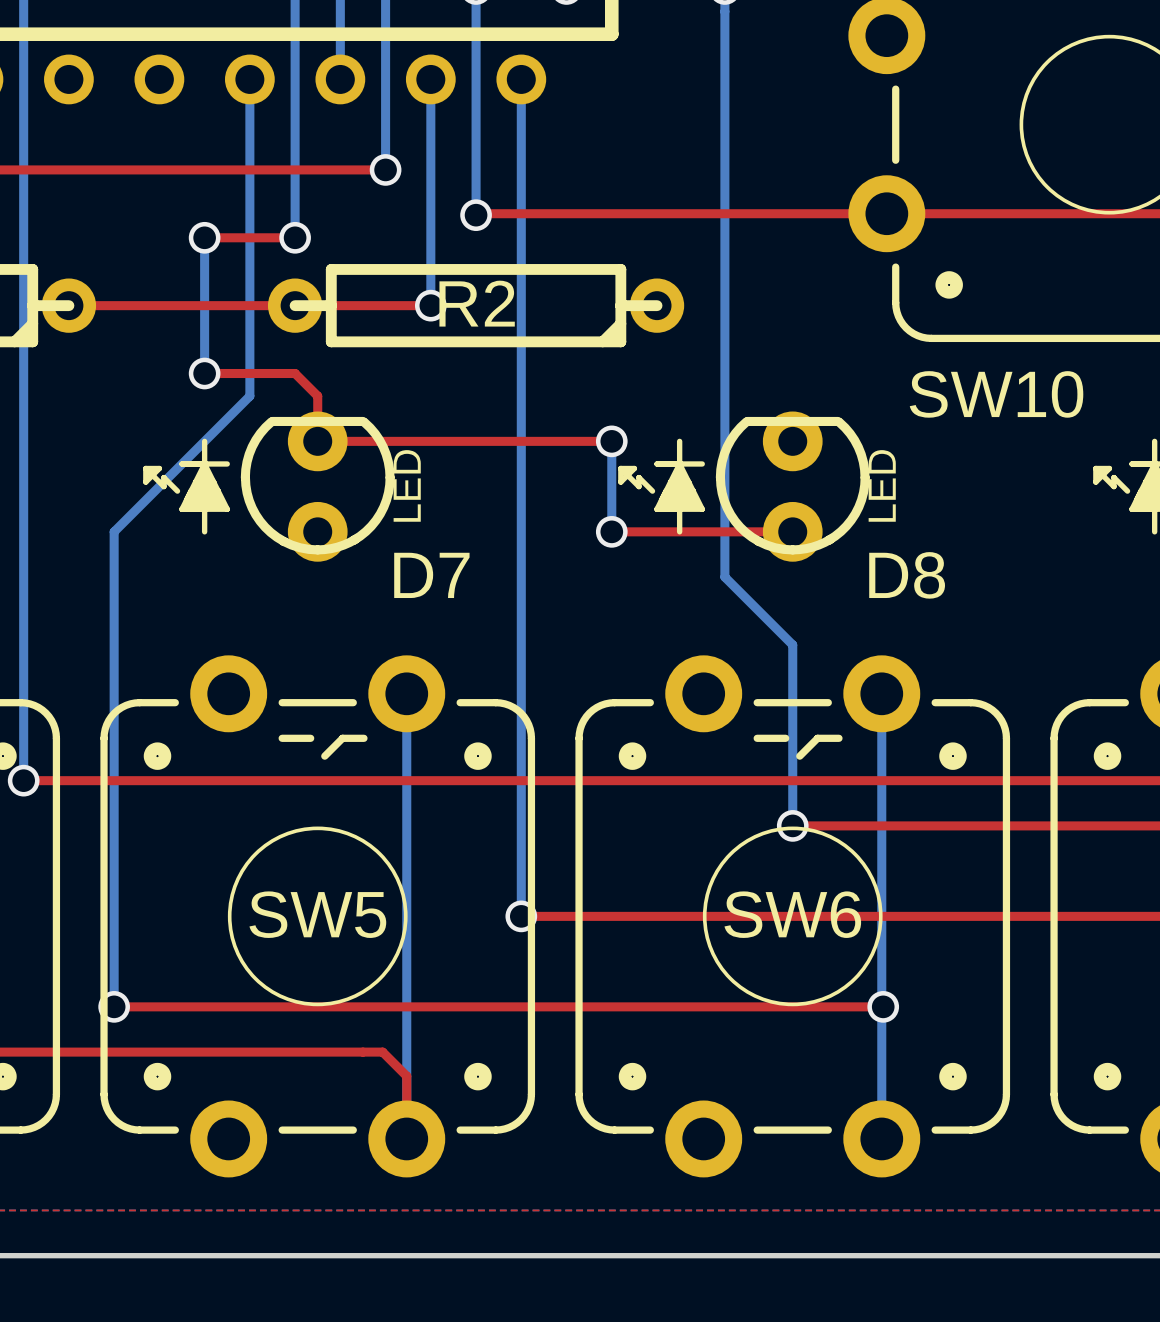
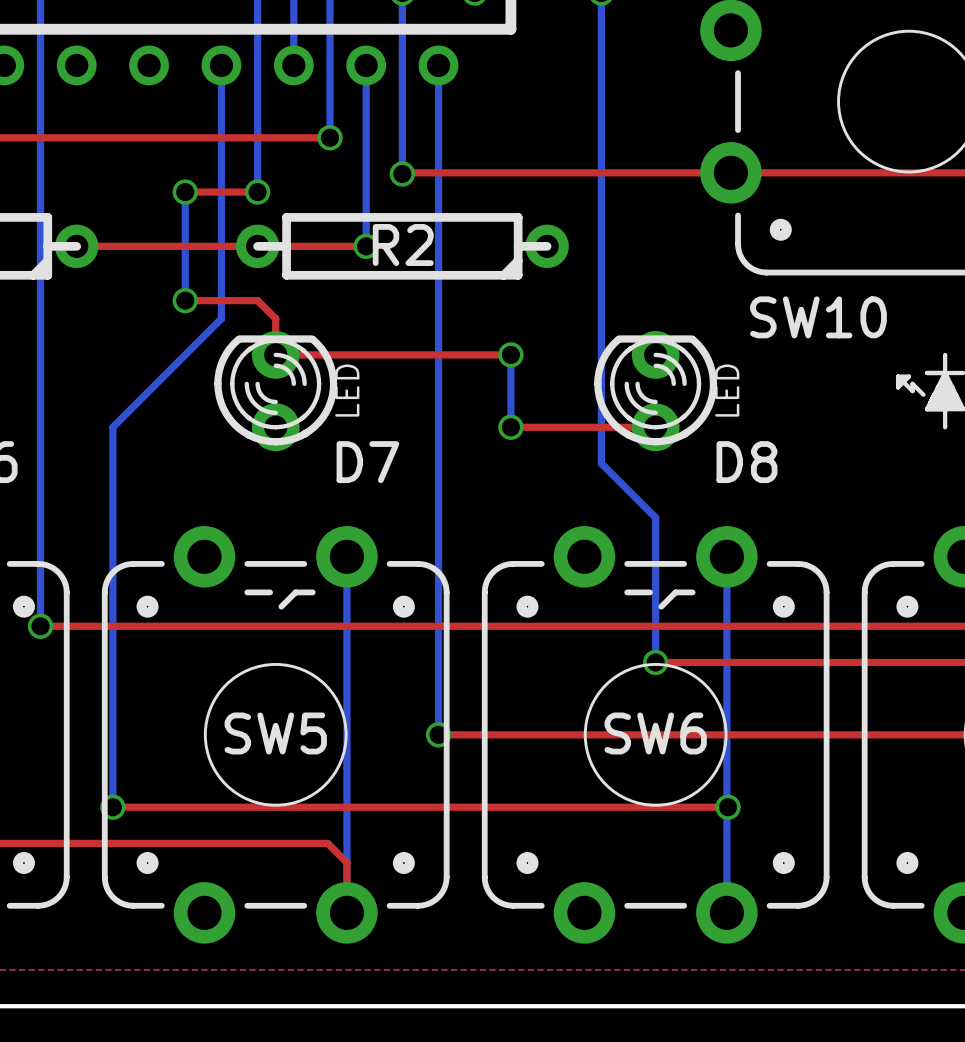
D7 footprint: [143, 411, 395, 562] -> [214, 331, 338, 452]
D8 footprint: [618, 411, 870, 562] -> [594, 331, 718, 452]

